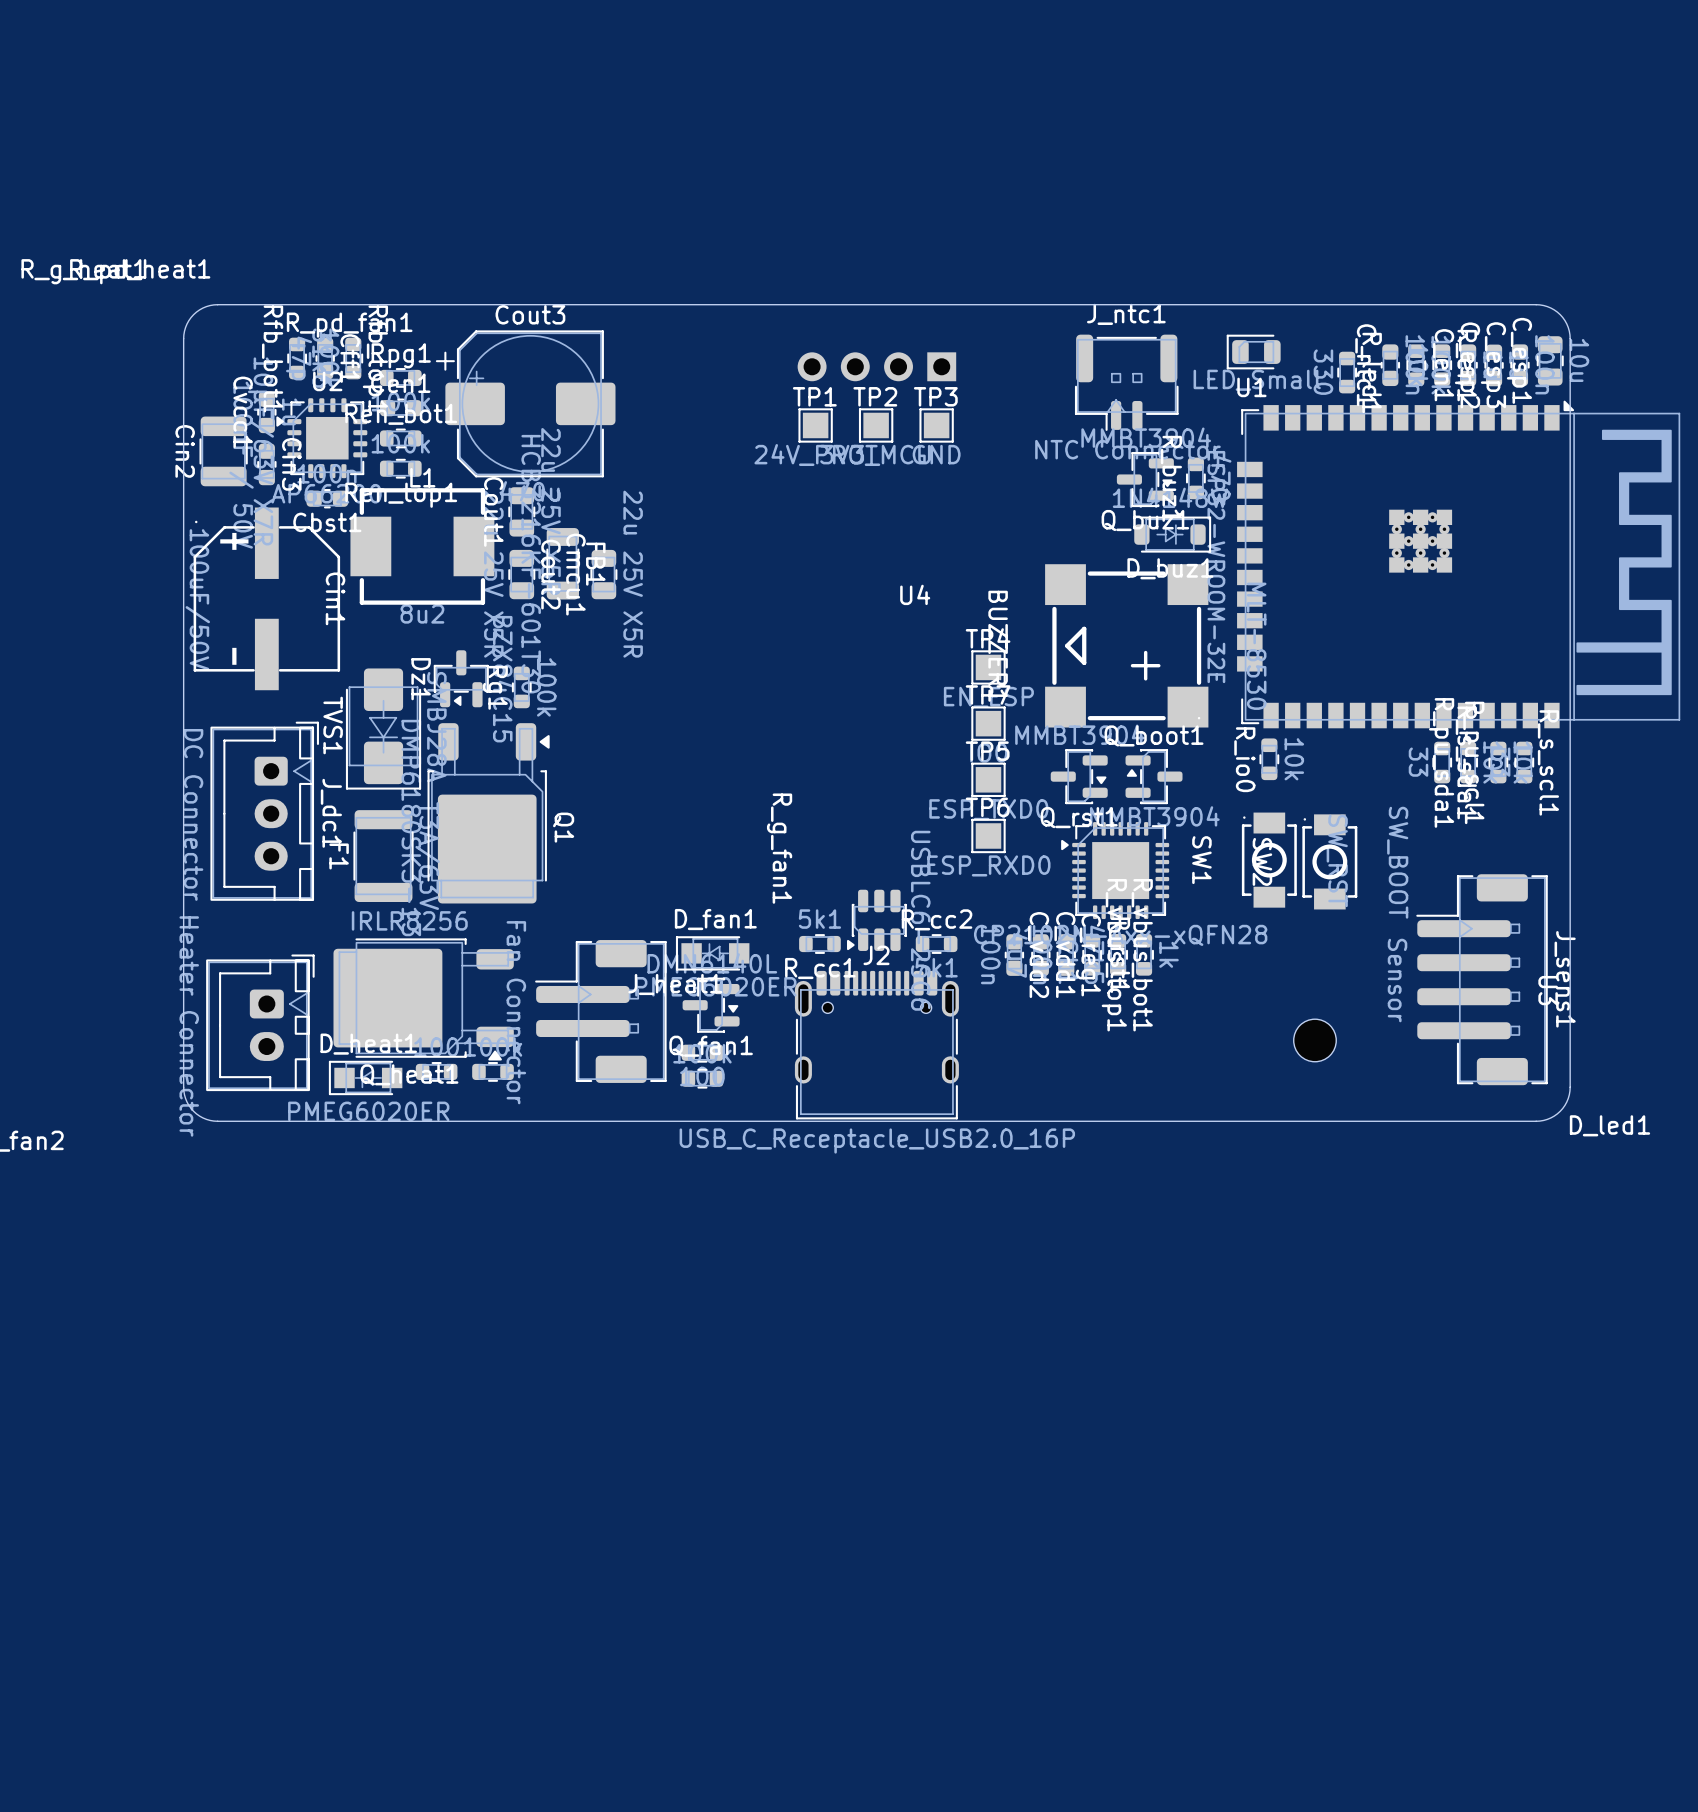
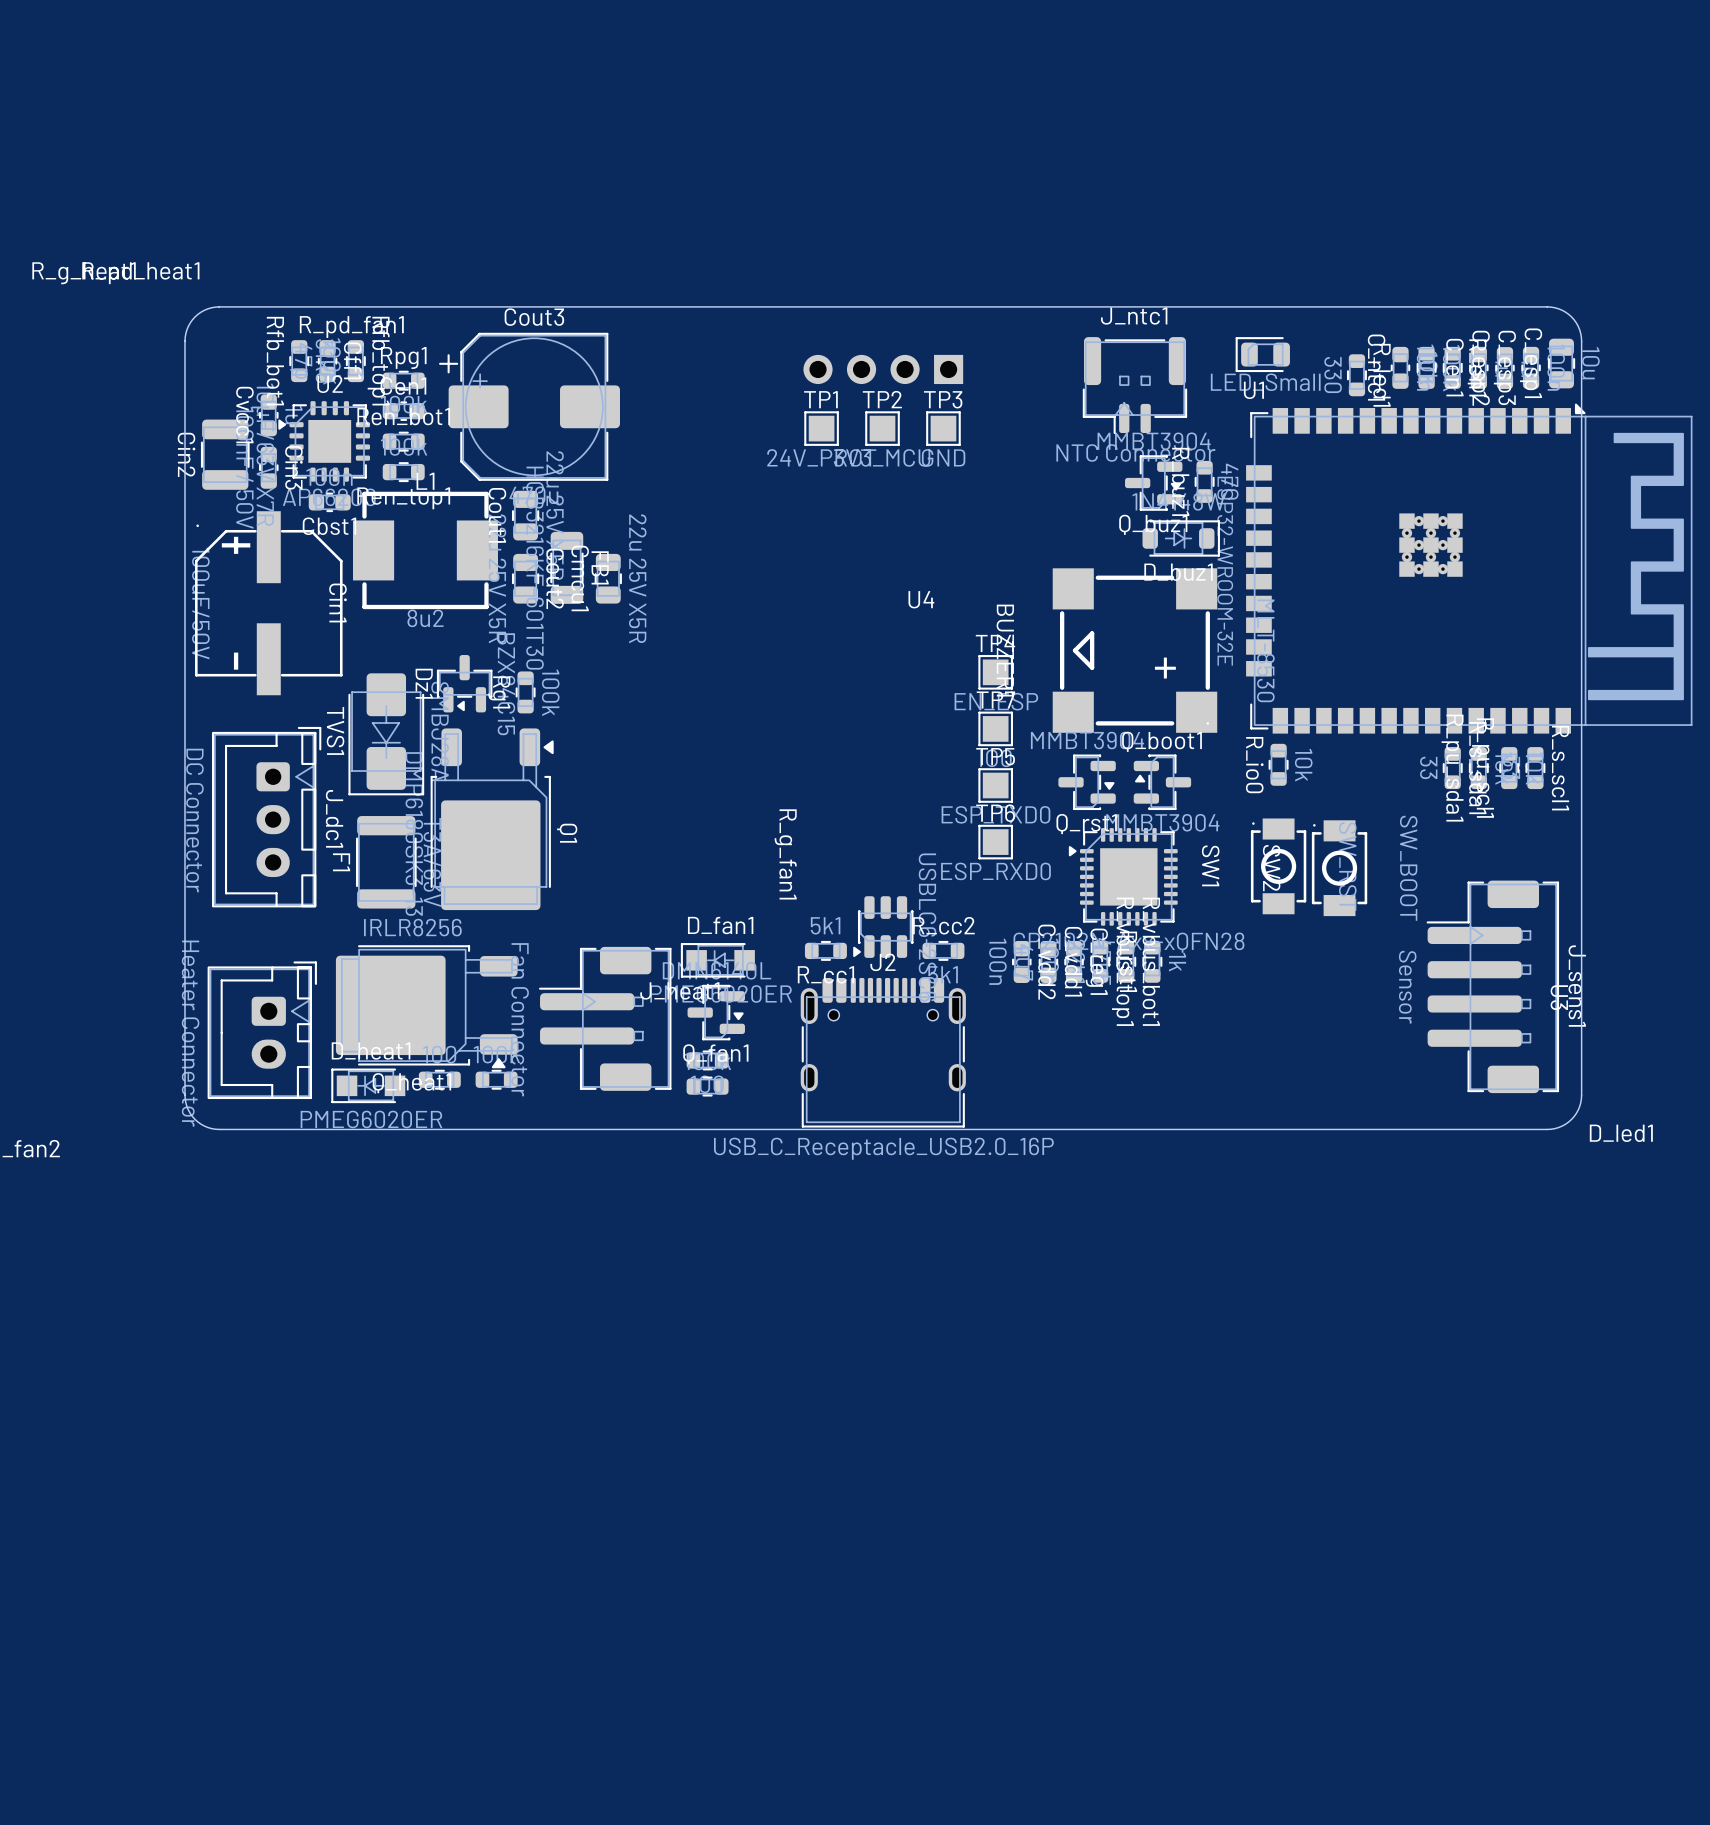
part: (1314, 1040) -> none

